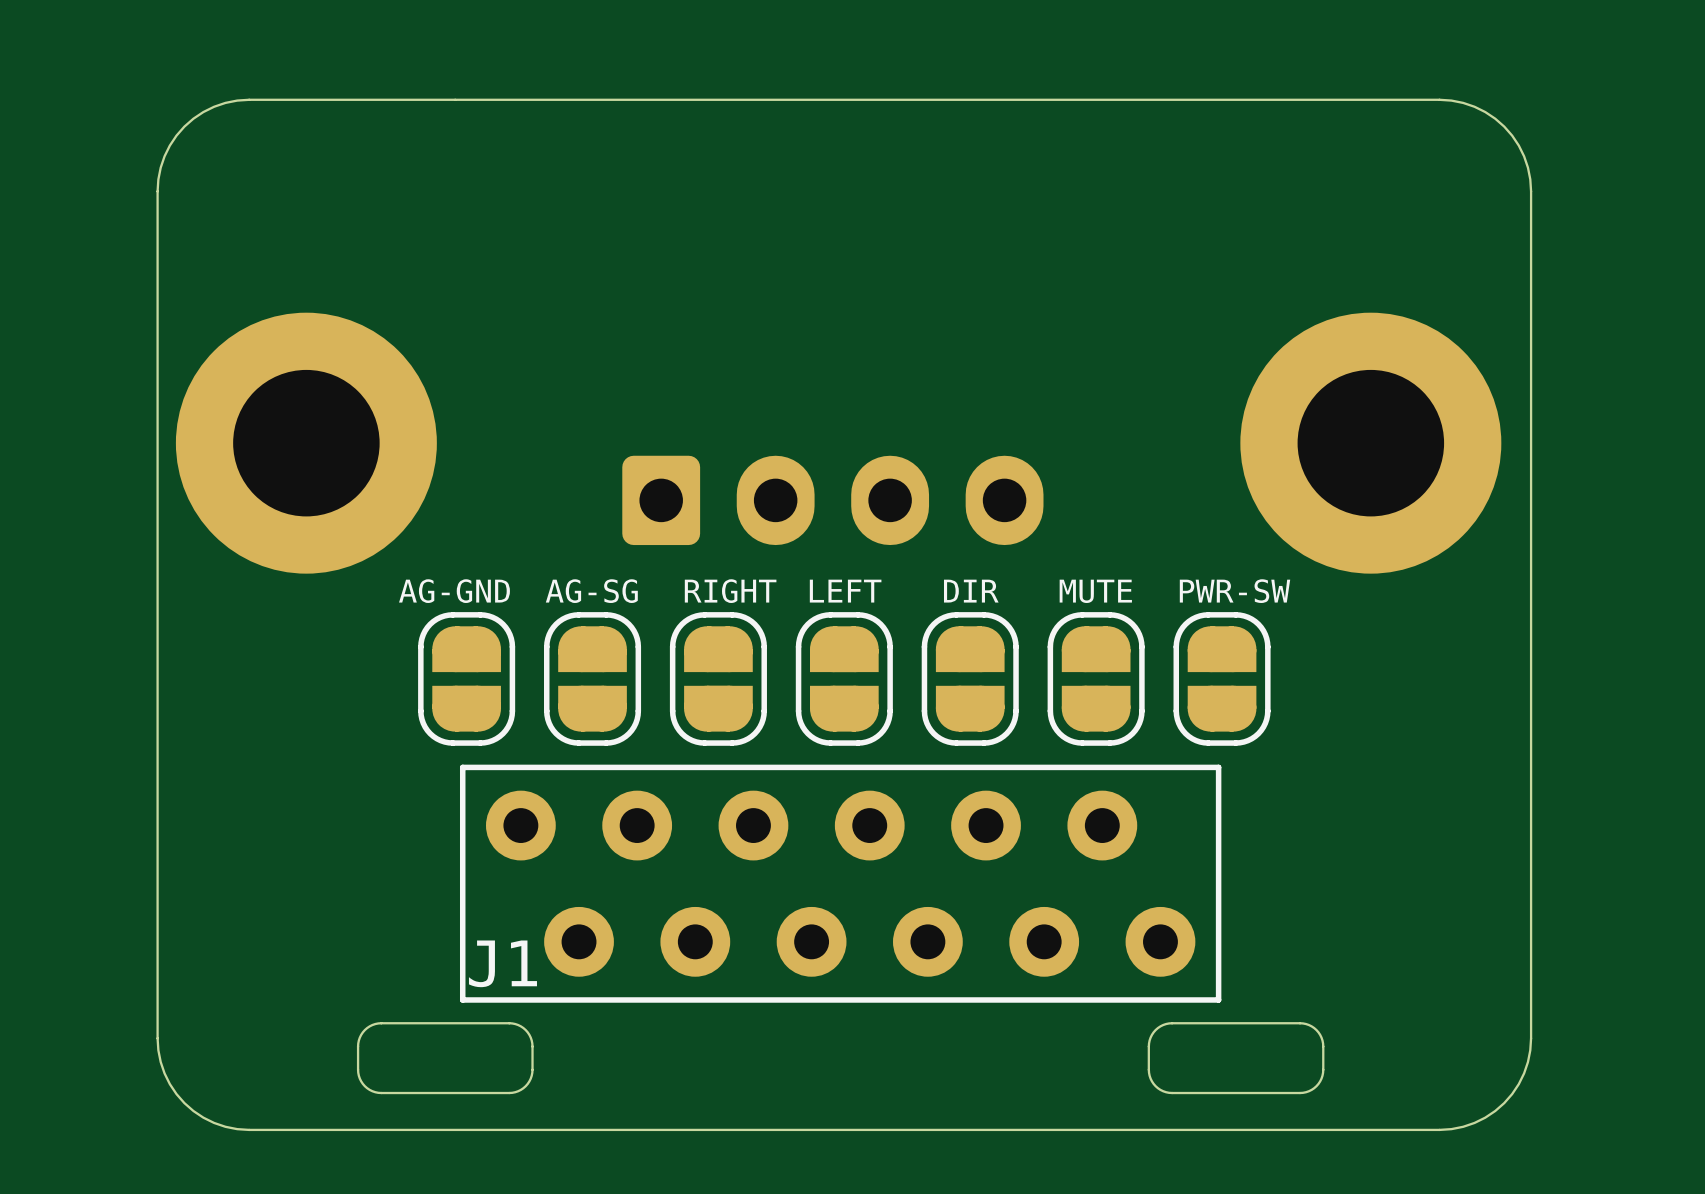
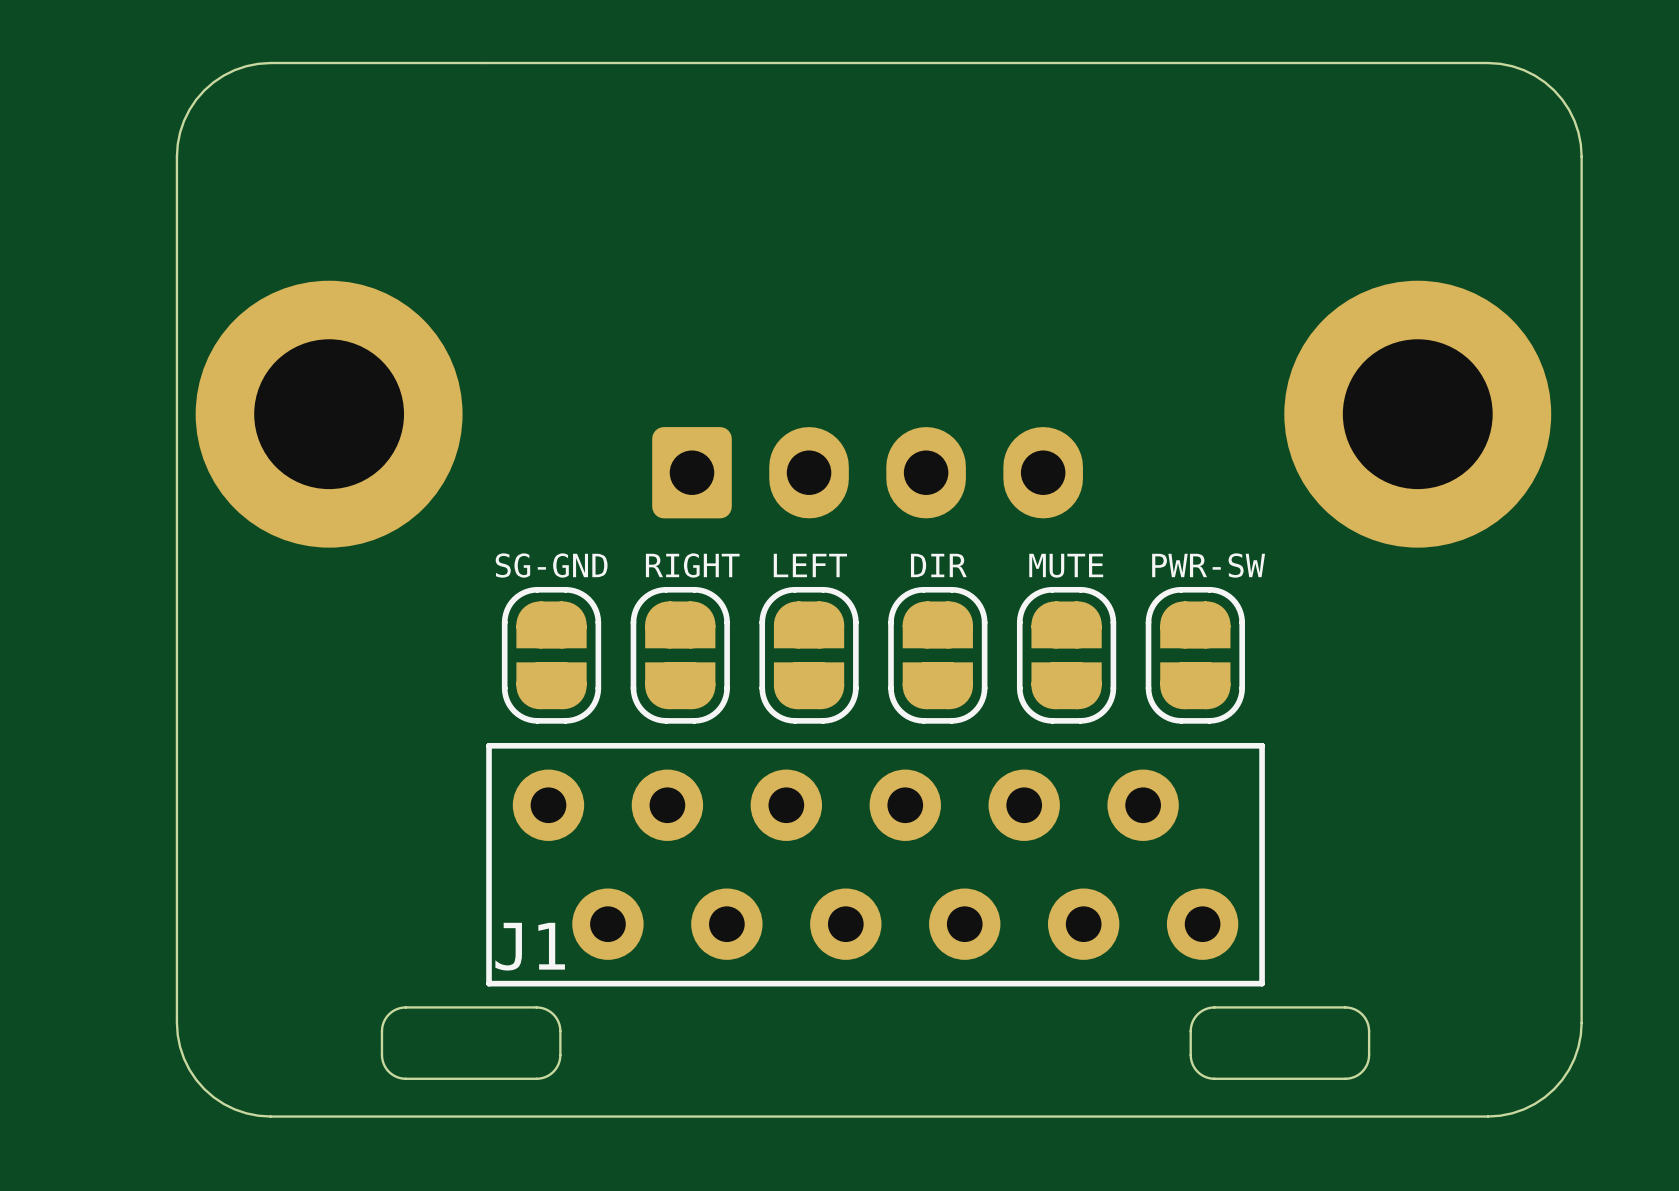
text: AG-GND (454, 591) -> SG-GND (551, 565)
text: AG-SG (591, 591) -> none
text position: RIGHT (730, 591) -> RIGHT (692, 565)
text position: LEFT (845, 591) -> LEFT (810, 565)
text position: DIR (971, 591) -> DIR (938, 565)
text position: MUTE (1095, 591) -> MUTE (1066, 565)
text position: PWR-SW (1235, 591) -> PWR-SW (1208, 565)
part: (466, 678) -> none
part: none -> (551, 655)
part: (592, 678) -> none
part: none -> (680, 655)
part: (718, 678) -> none
part: none -> (809, 655)
part: (844, 678) -> none
part: none -> (937, 655)
part: (970, 678) -> none
part: none -> (1066, 655)
part: (1096, 678) -> none
part: none -> (1195, 655)
part: (1222, 678) -> none

